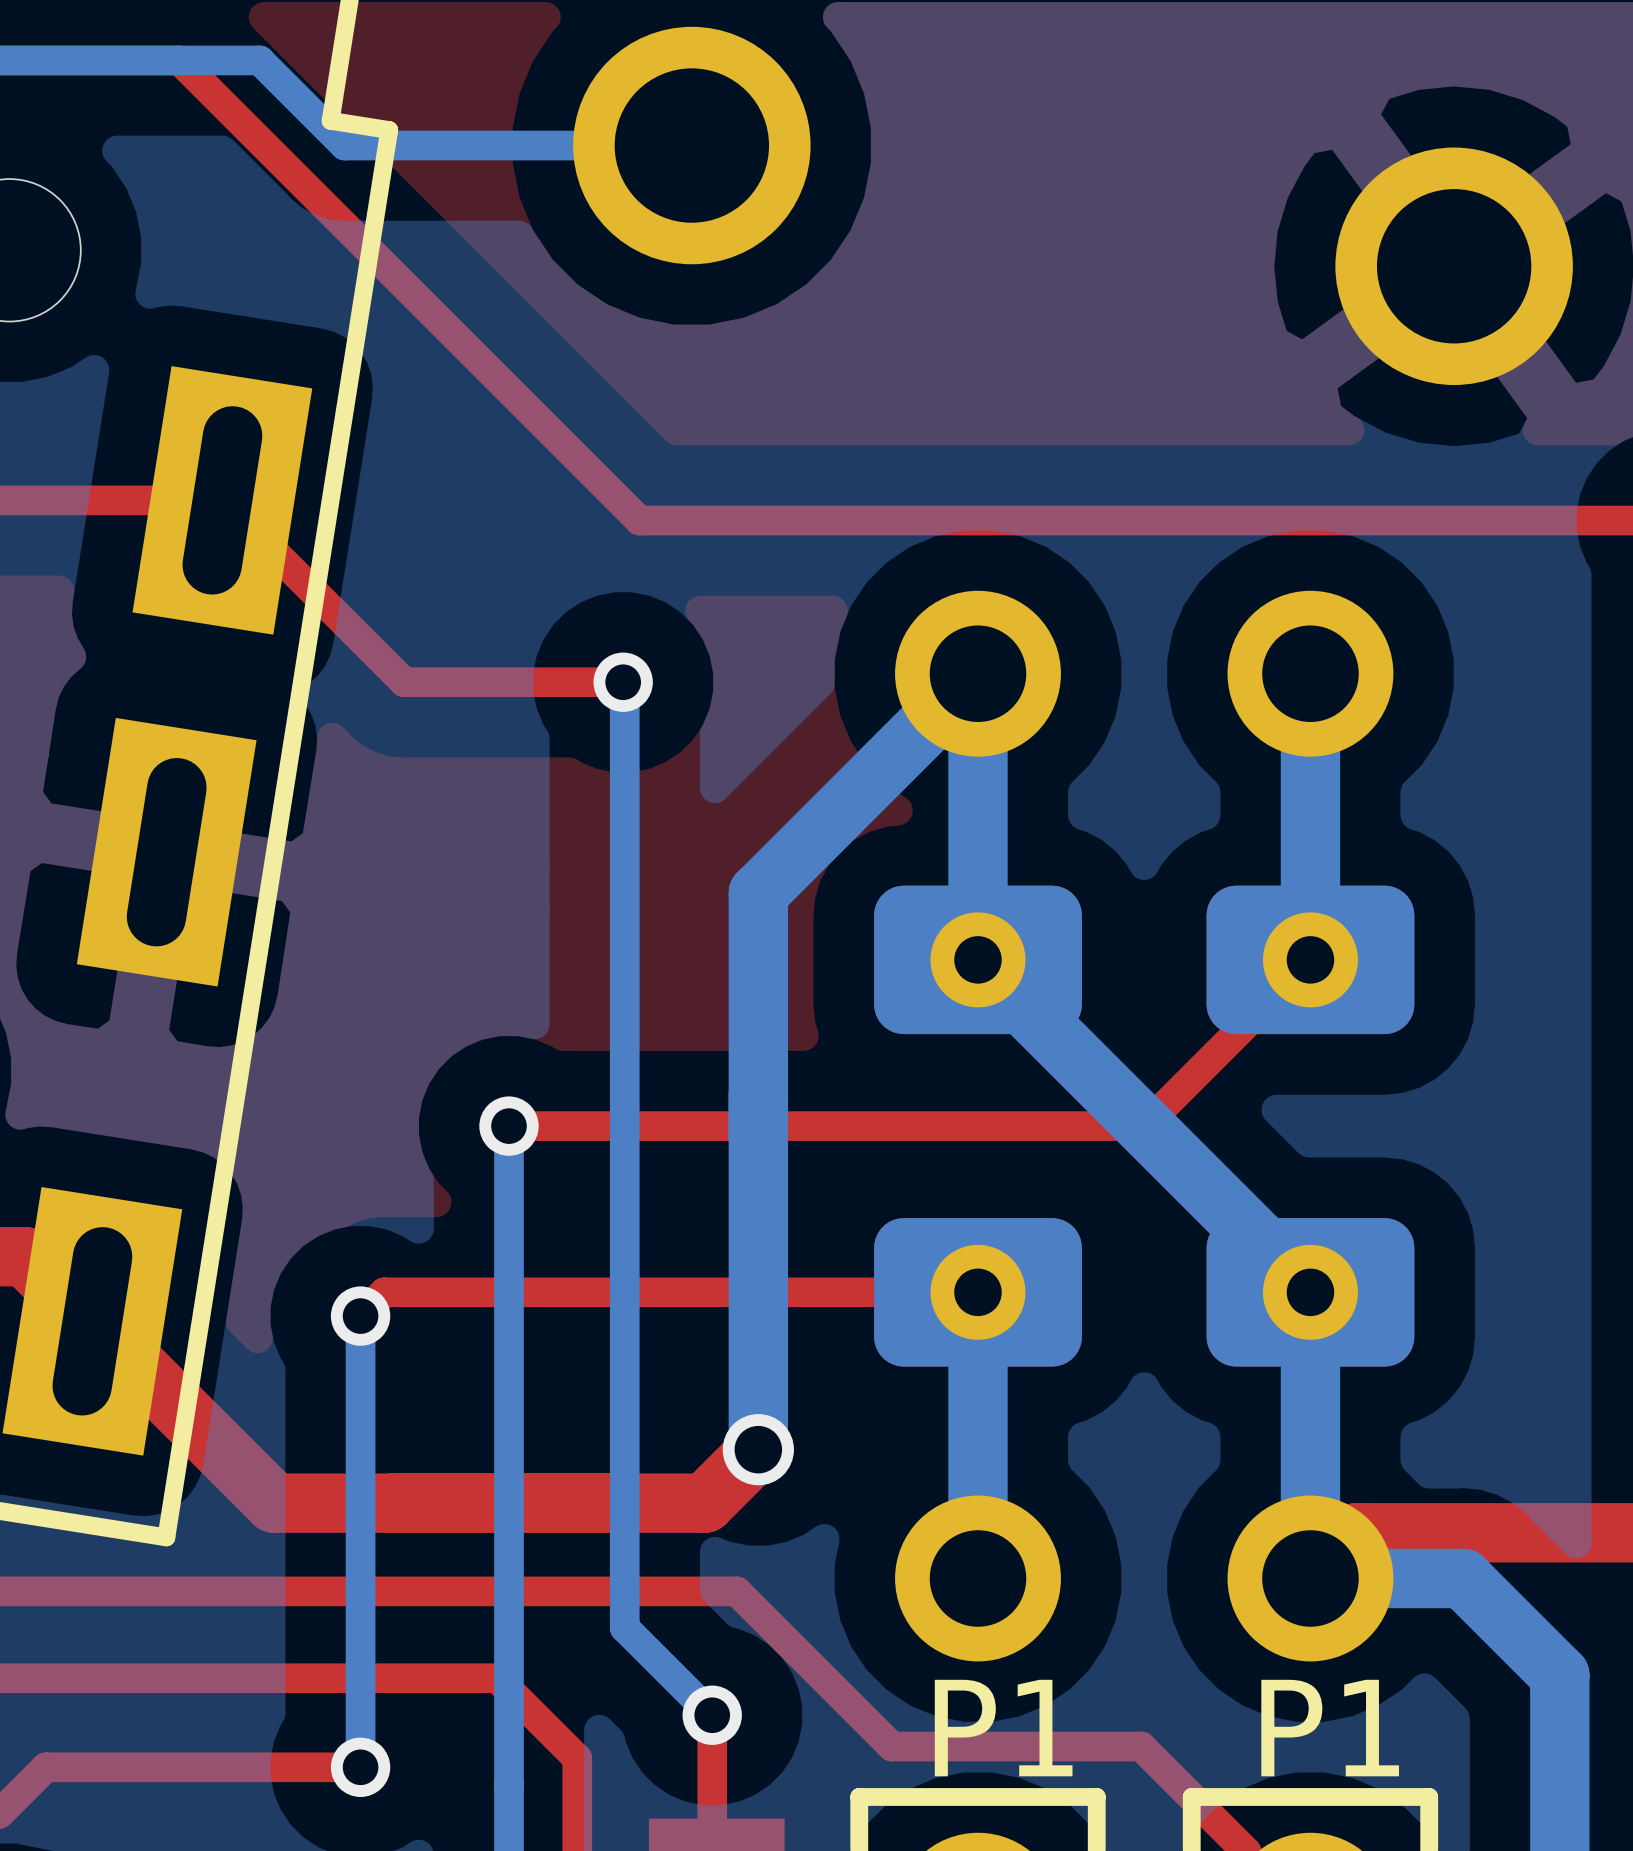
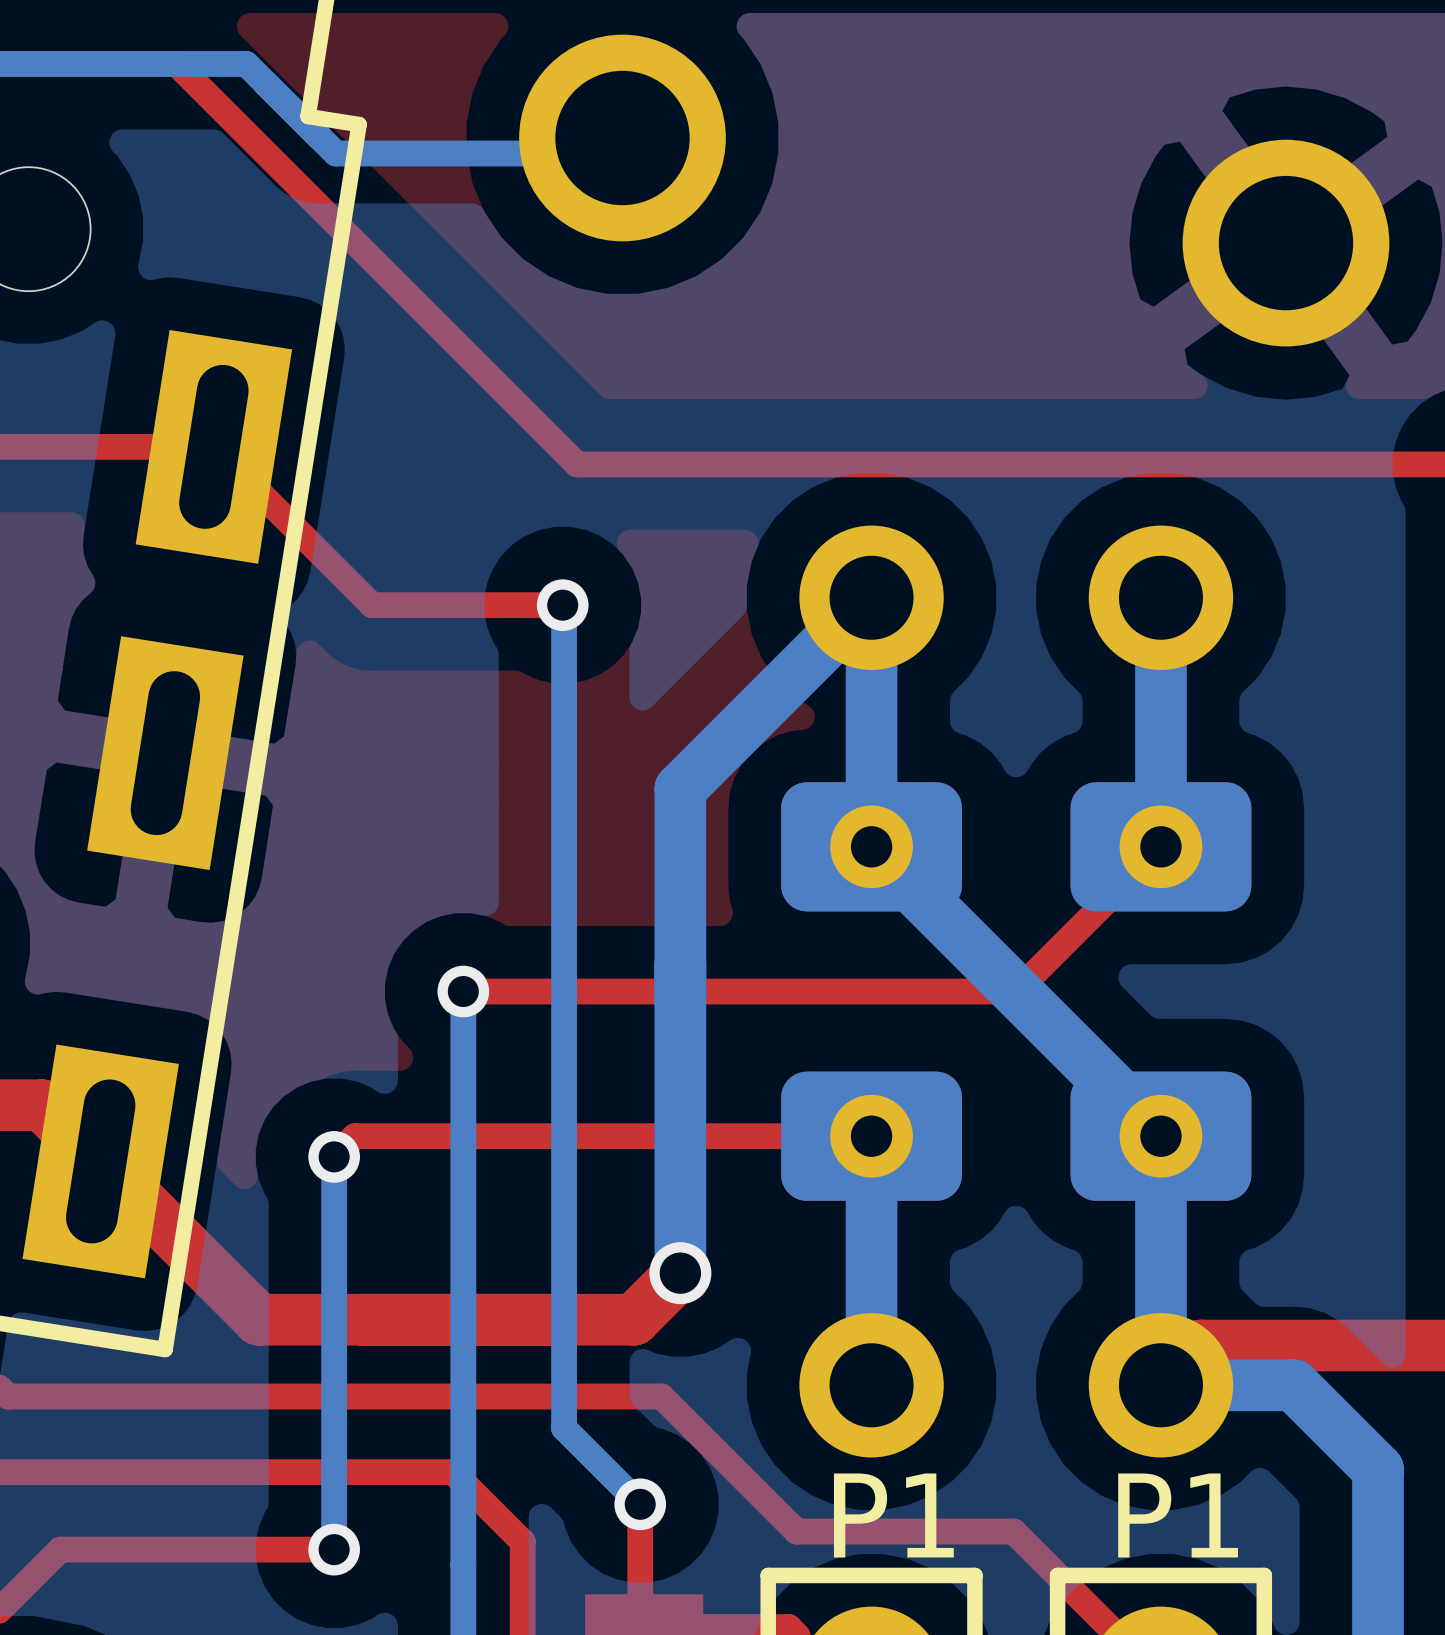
bottom track: (691, 145) (344, 145) -> (622, 153) (335, 153) (320, 138)

